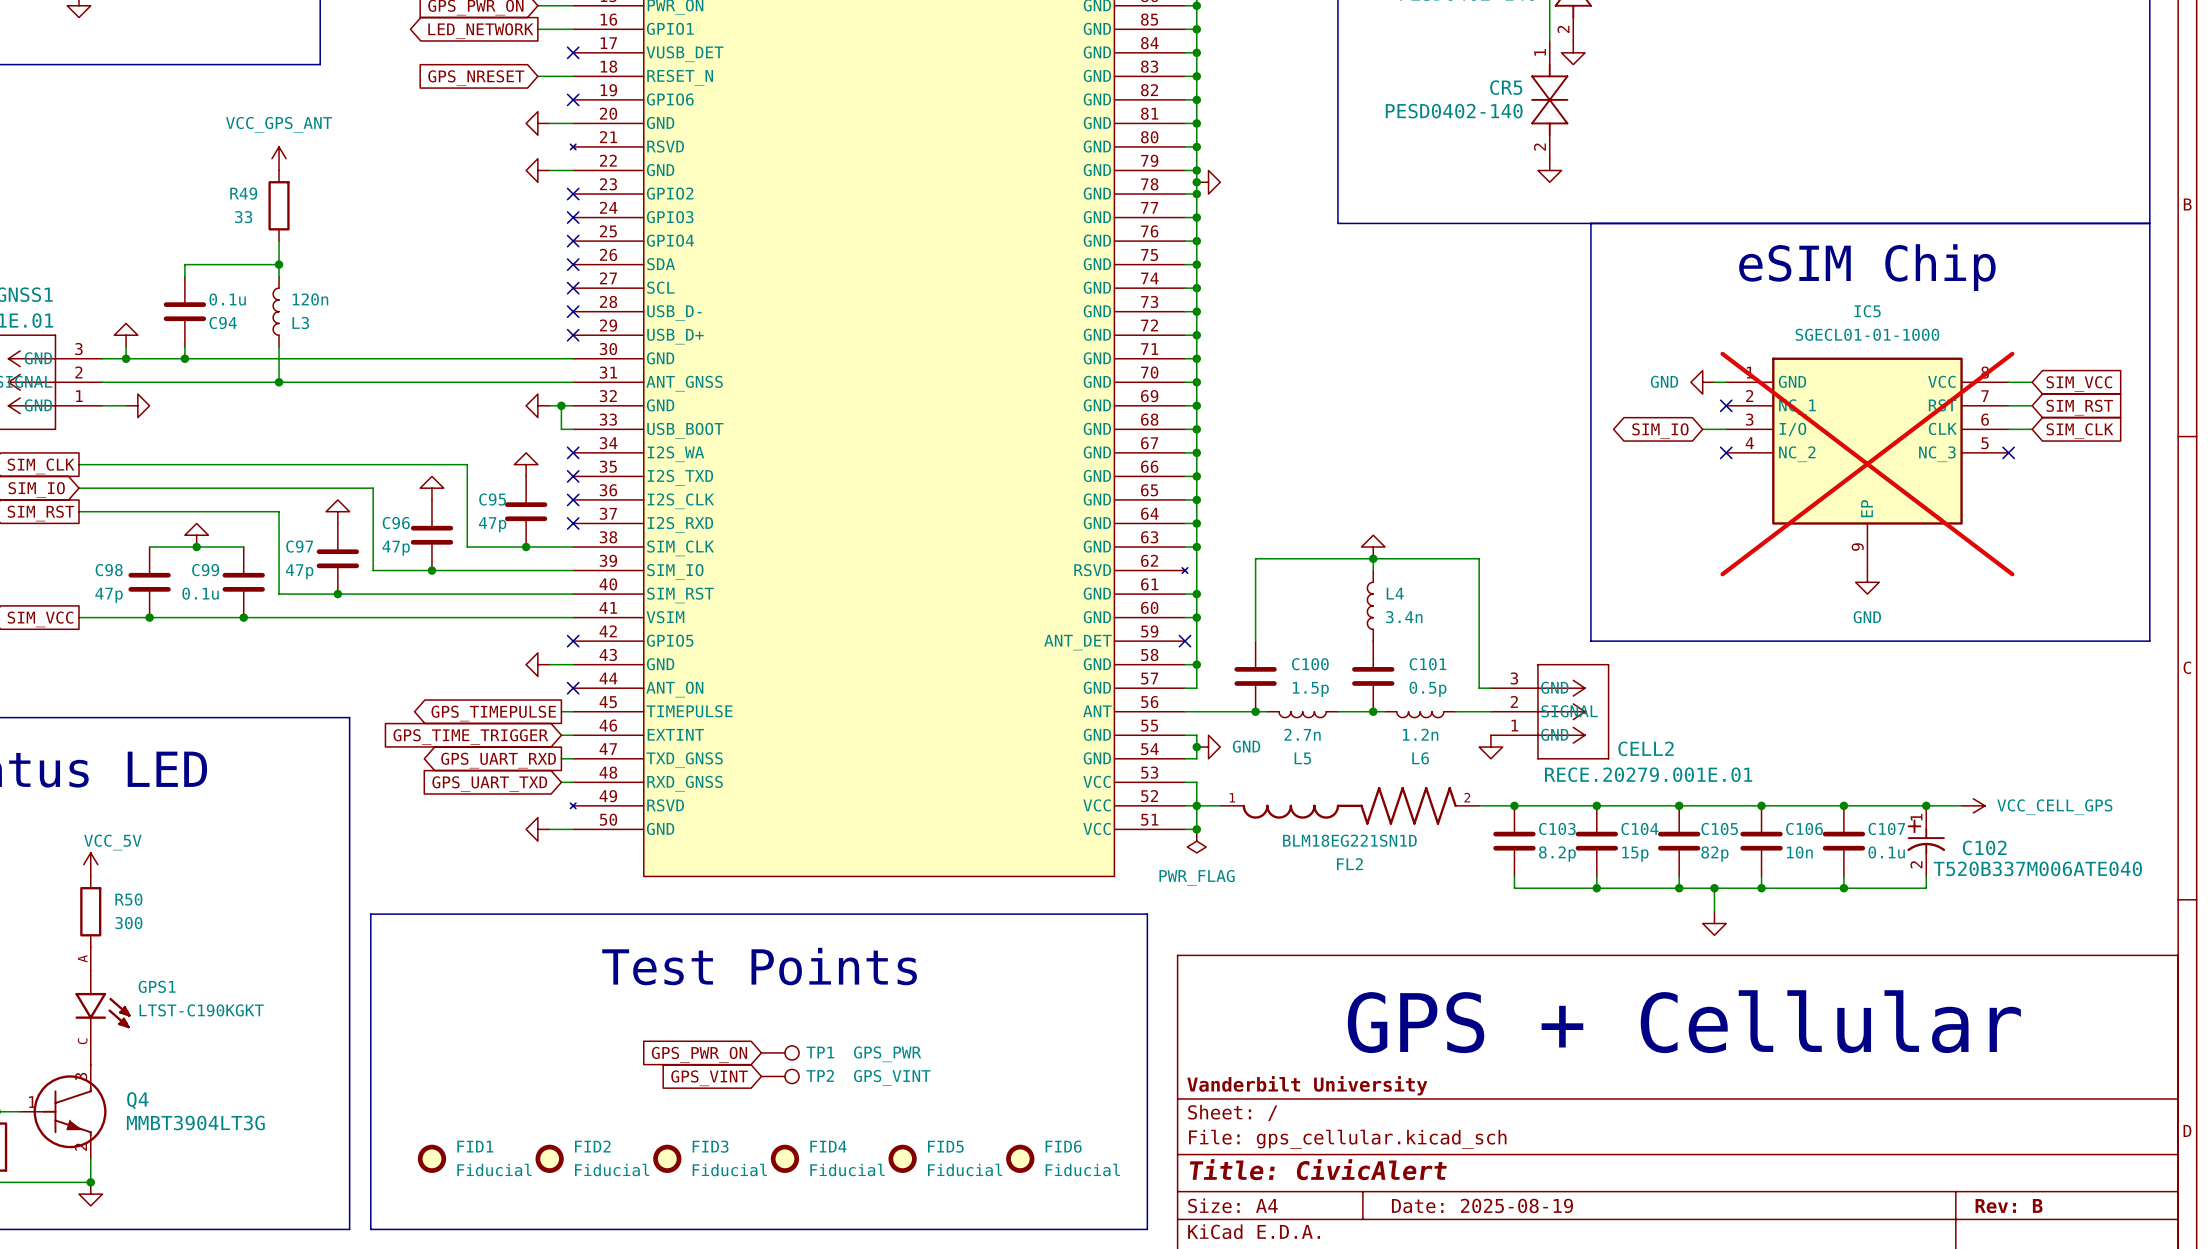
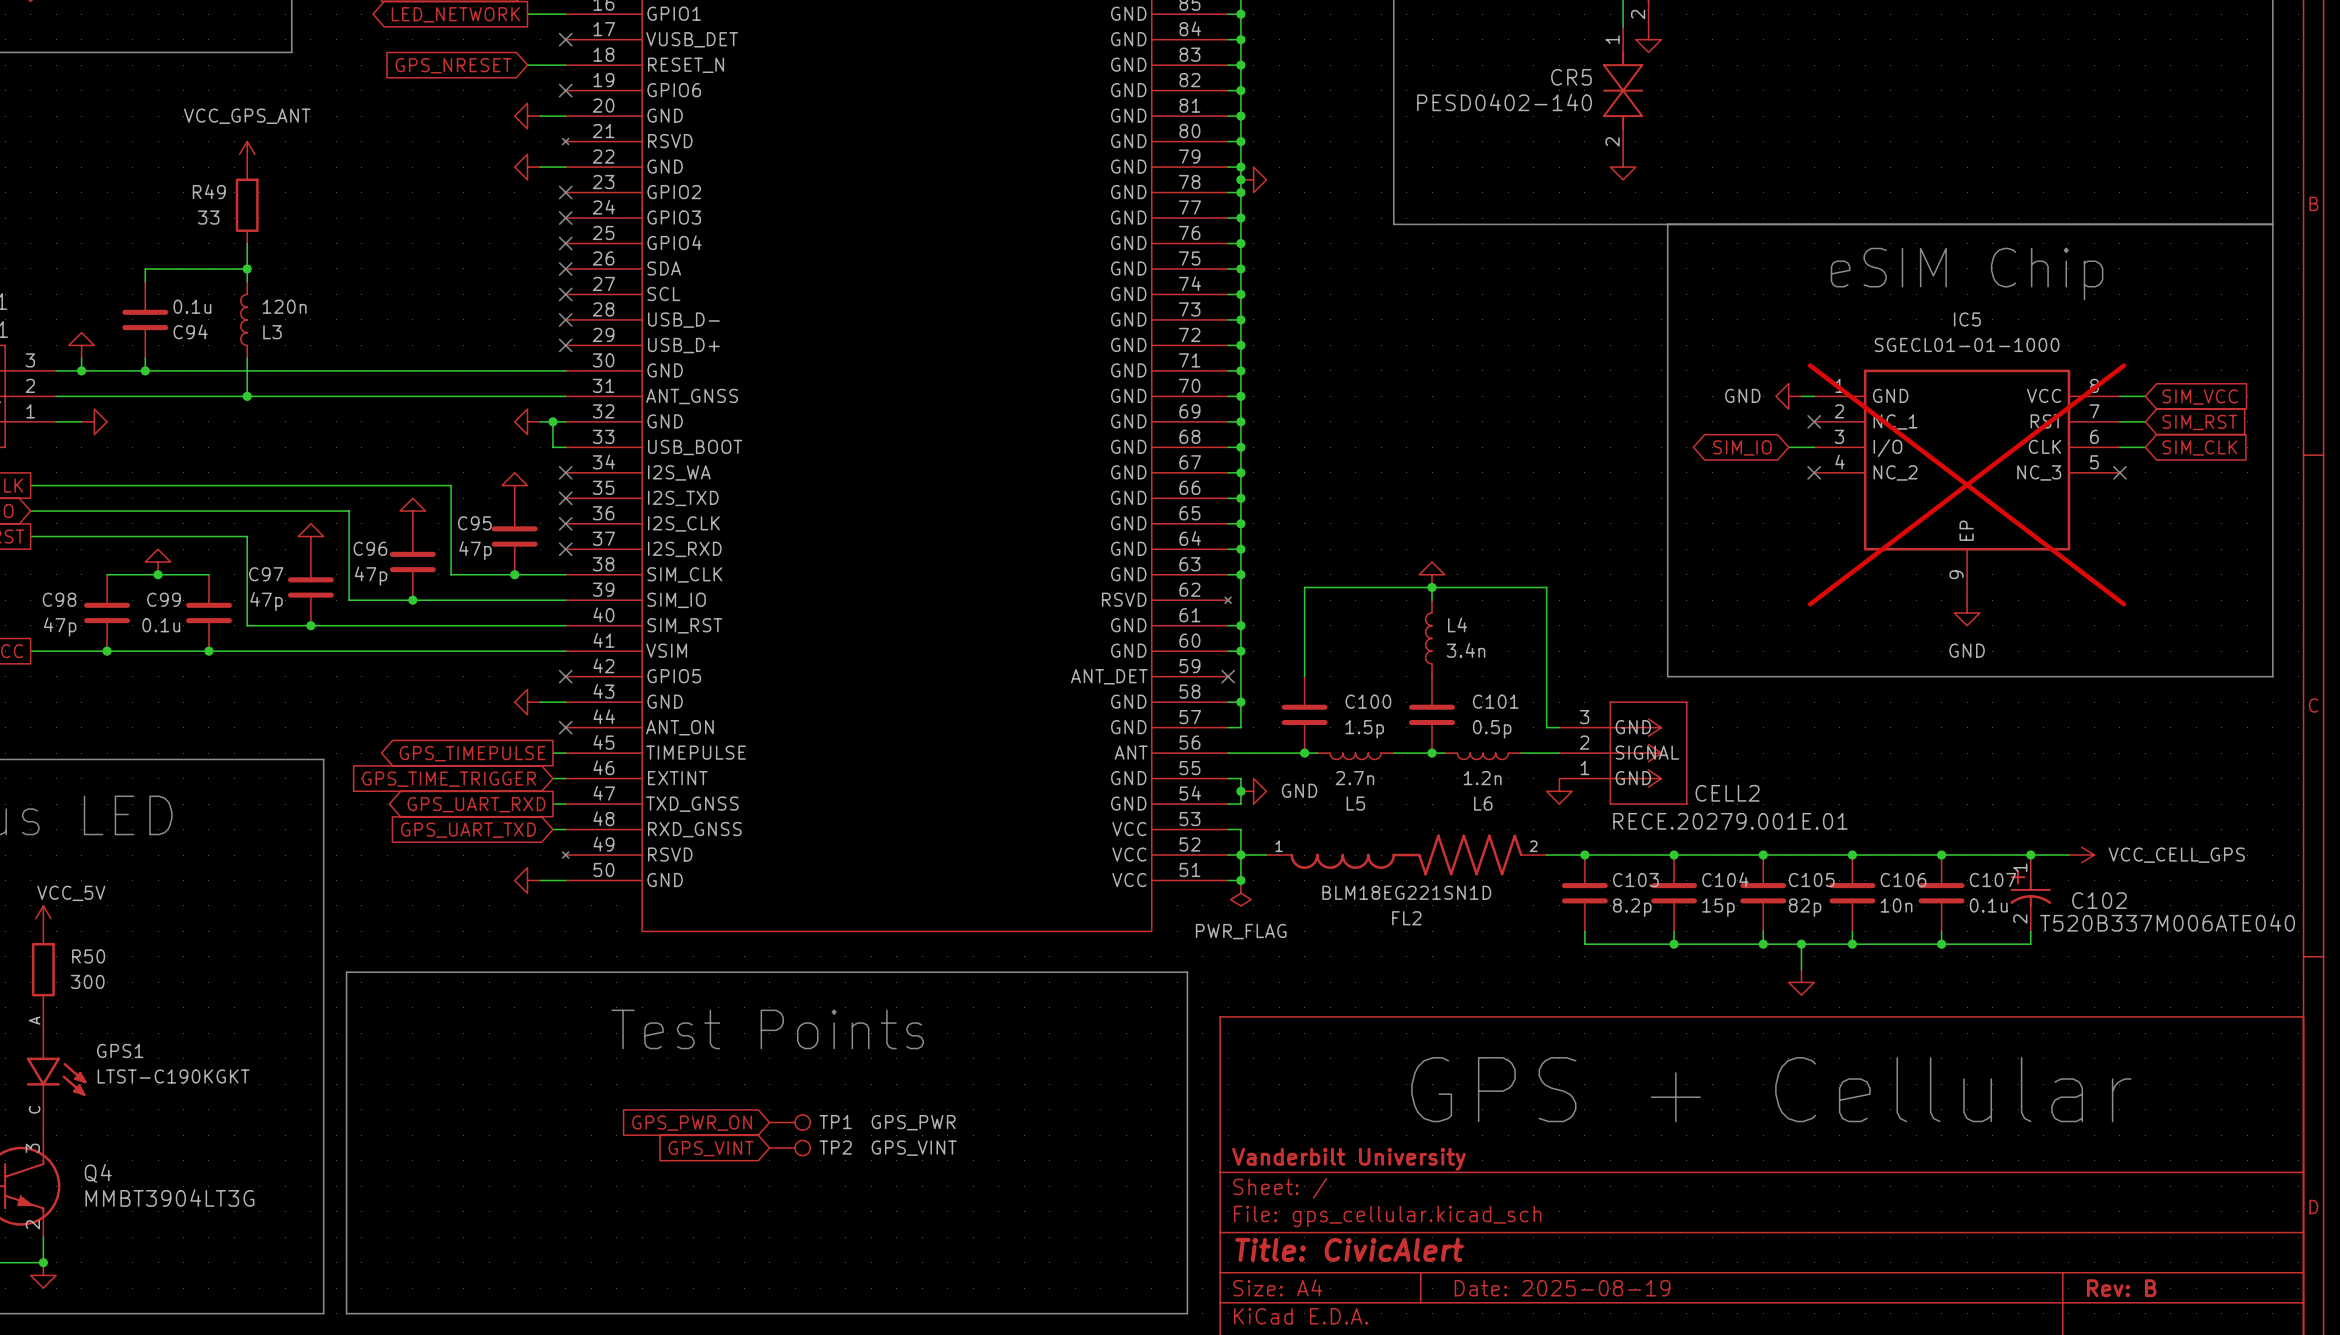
FID1: Fiducial (431, 1158) -> none
FID2: Fiducial (549, 1158) -> none
FID3: Fiducial (667, 1158) -> none
FID4: Fiducial (784, 1158) -> none
FID5: Fiducial (902, 1158) -> none
FID6: Fiducial (1020, 1158) -> none

